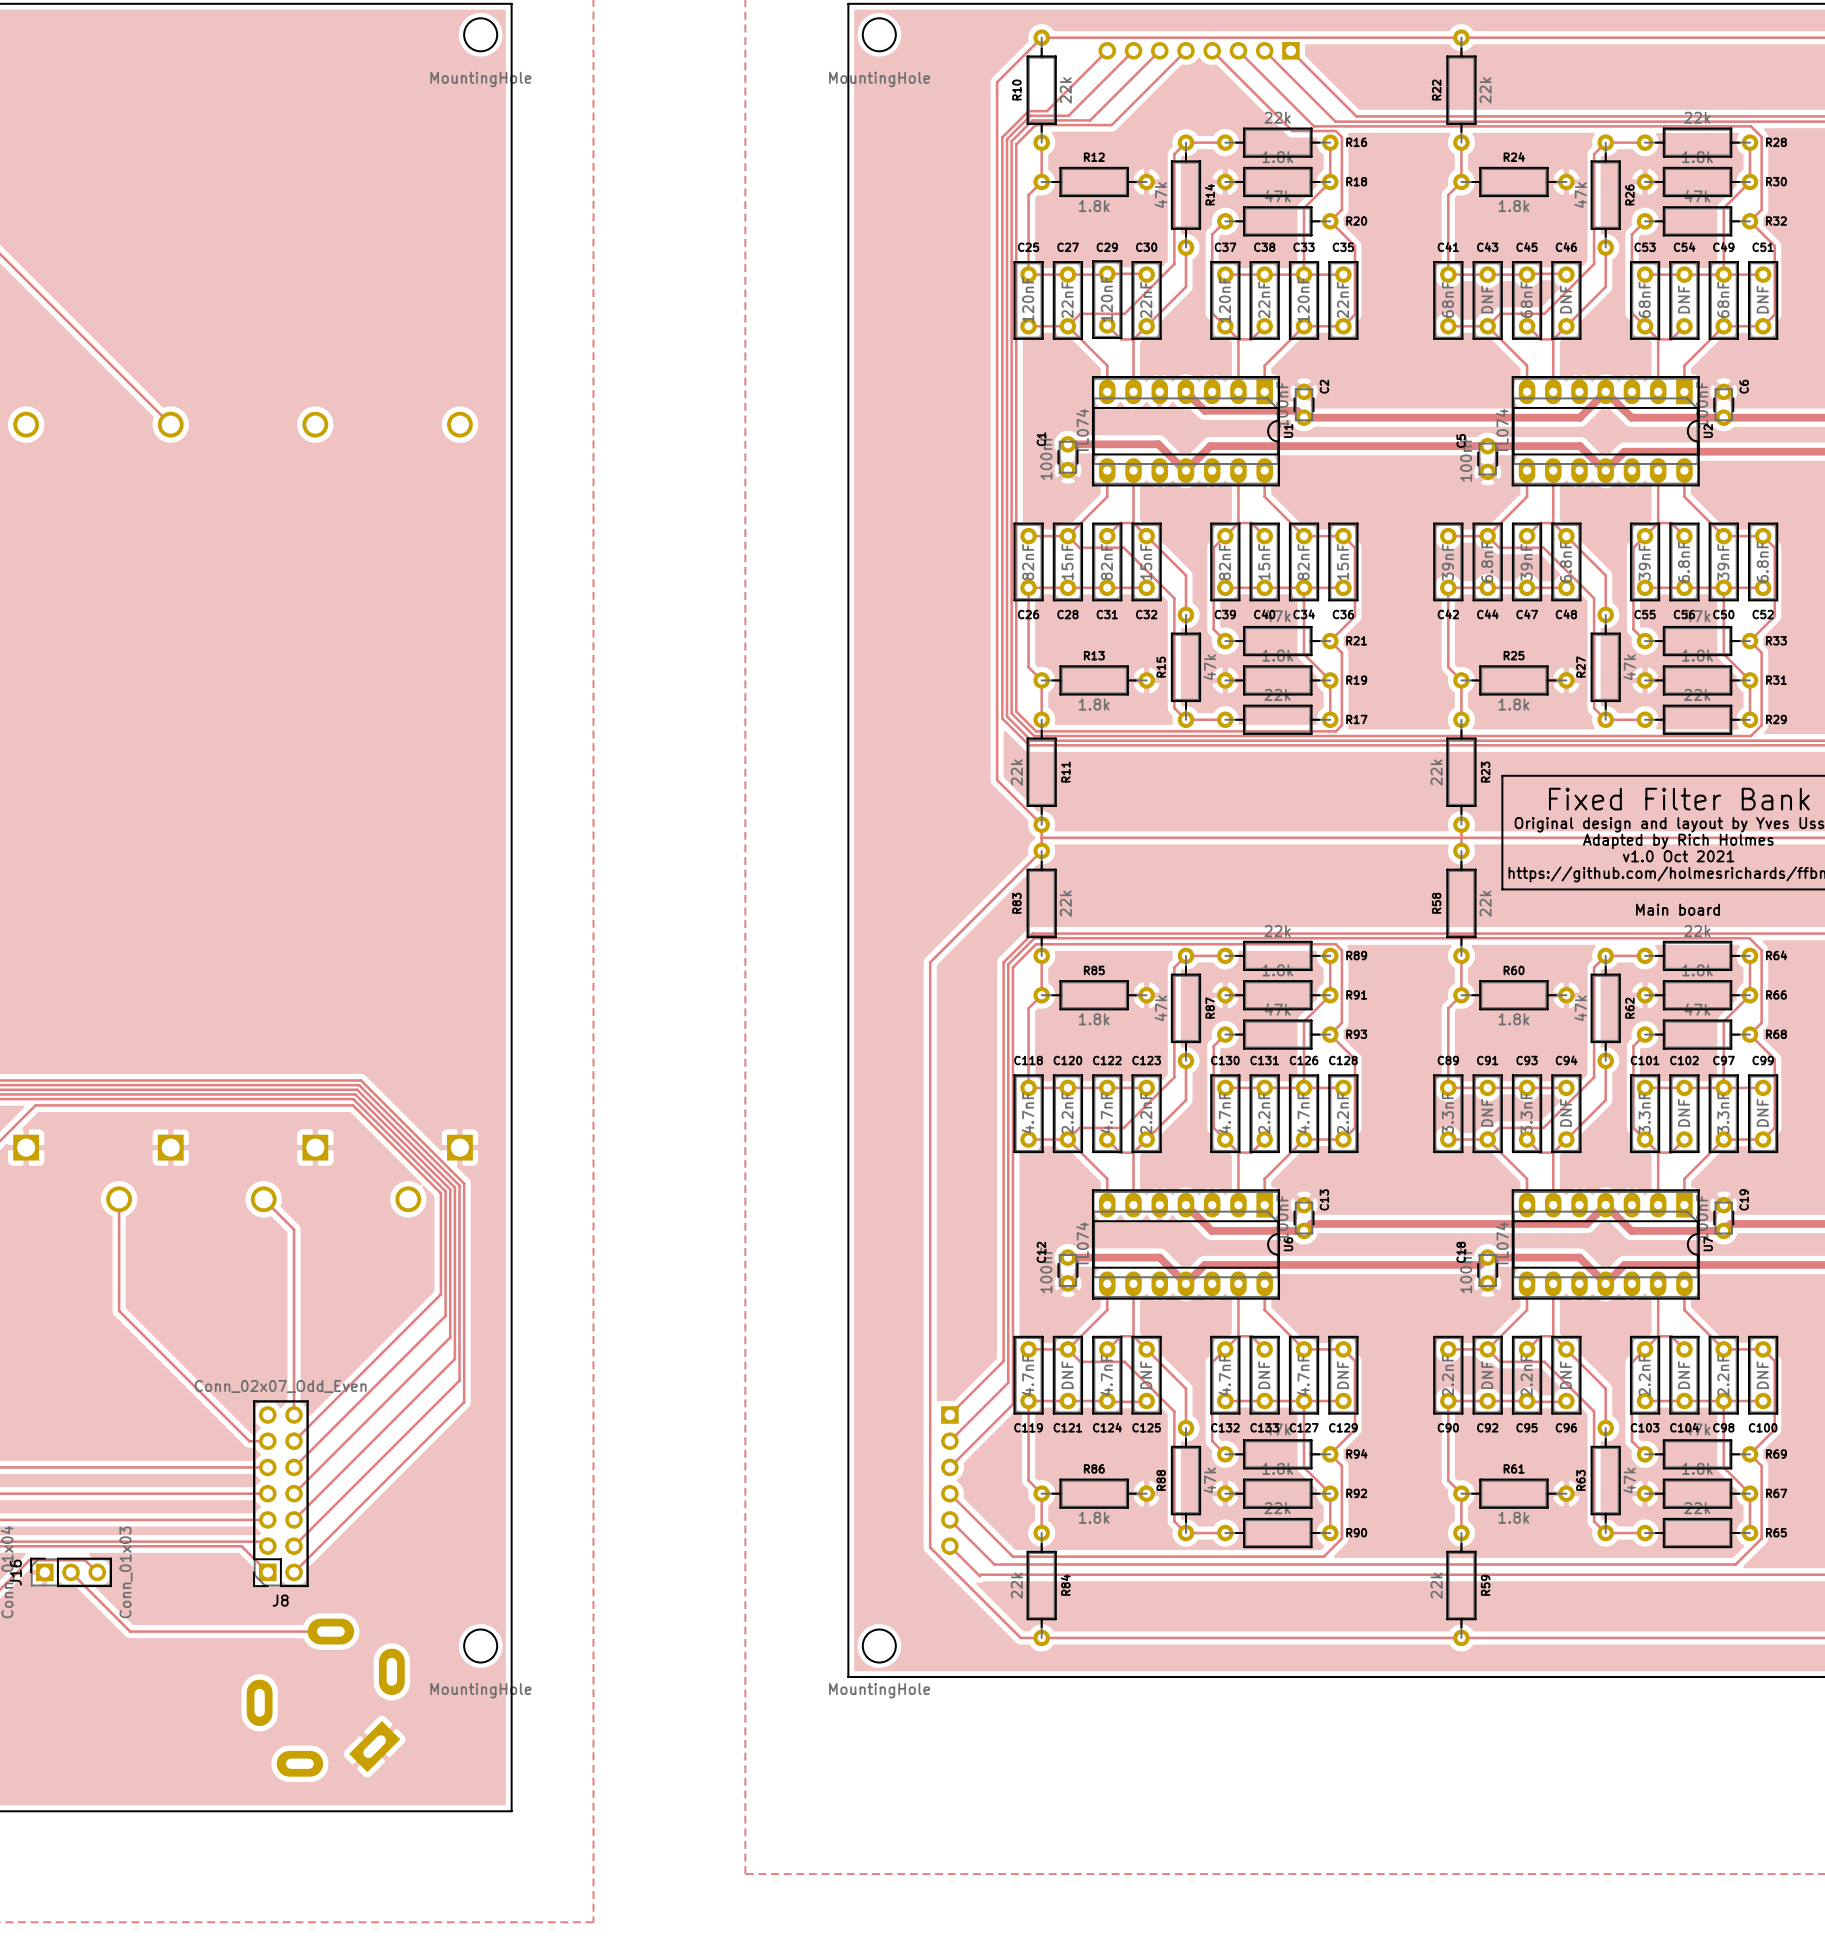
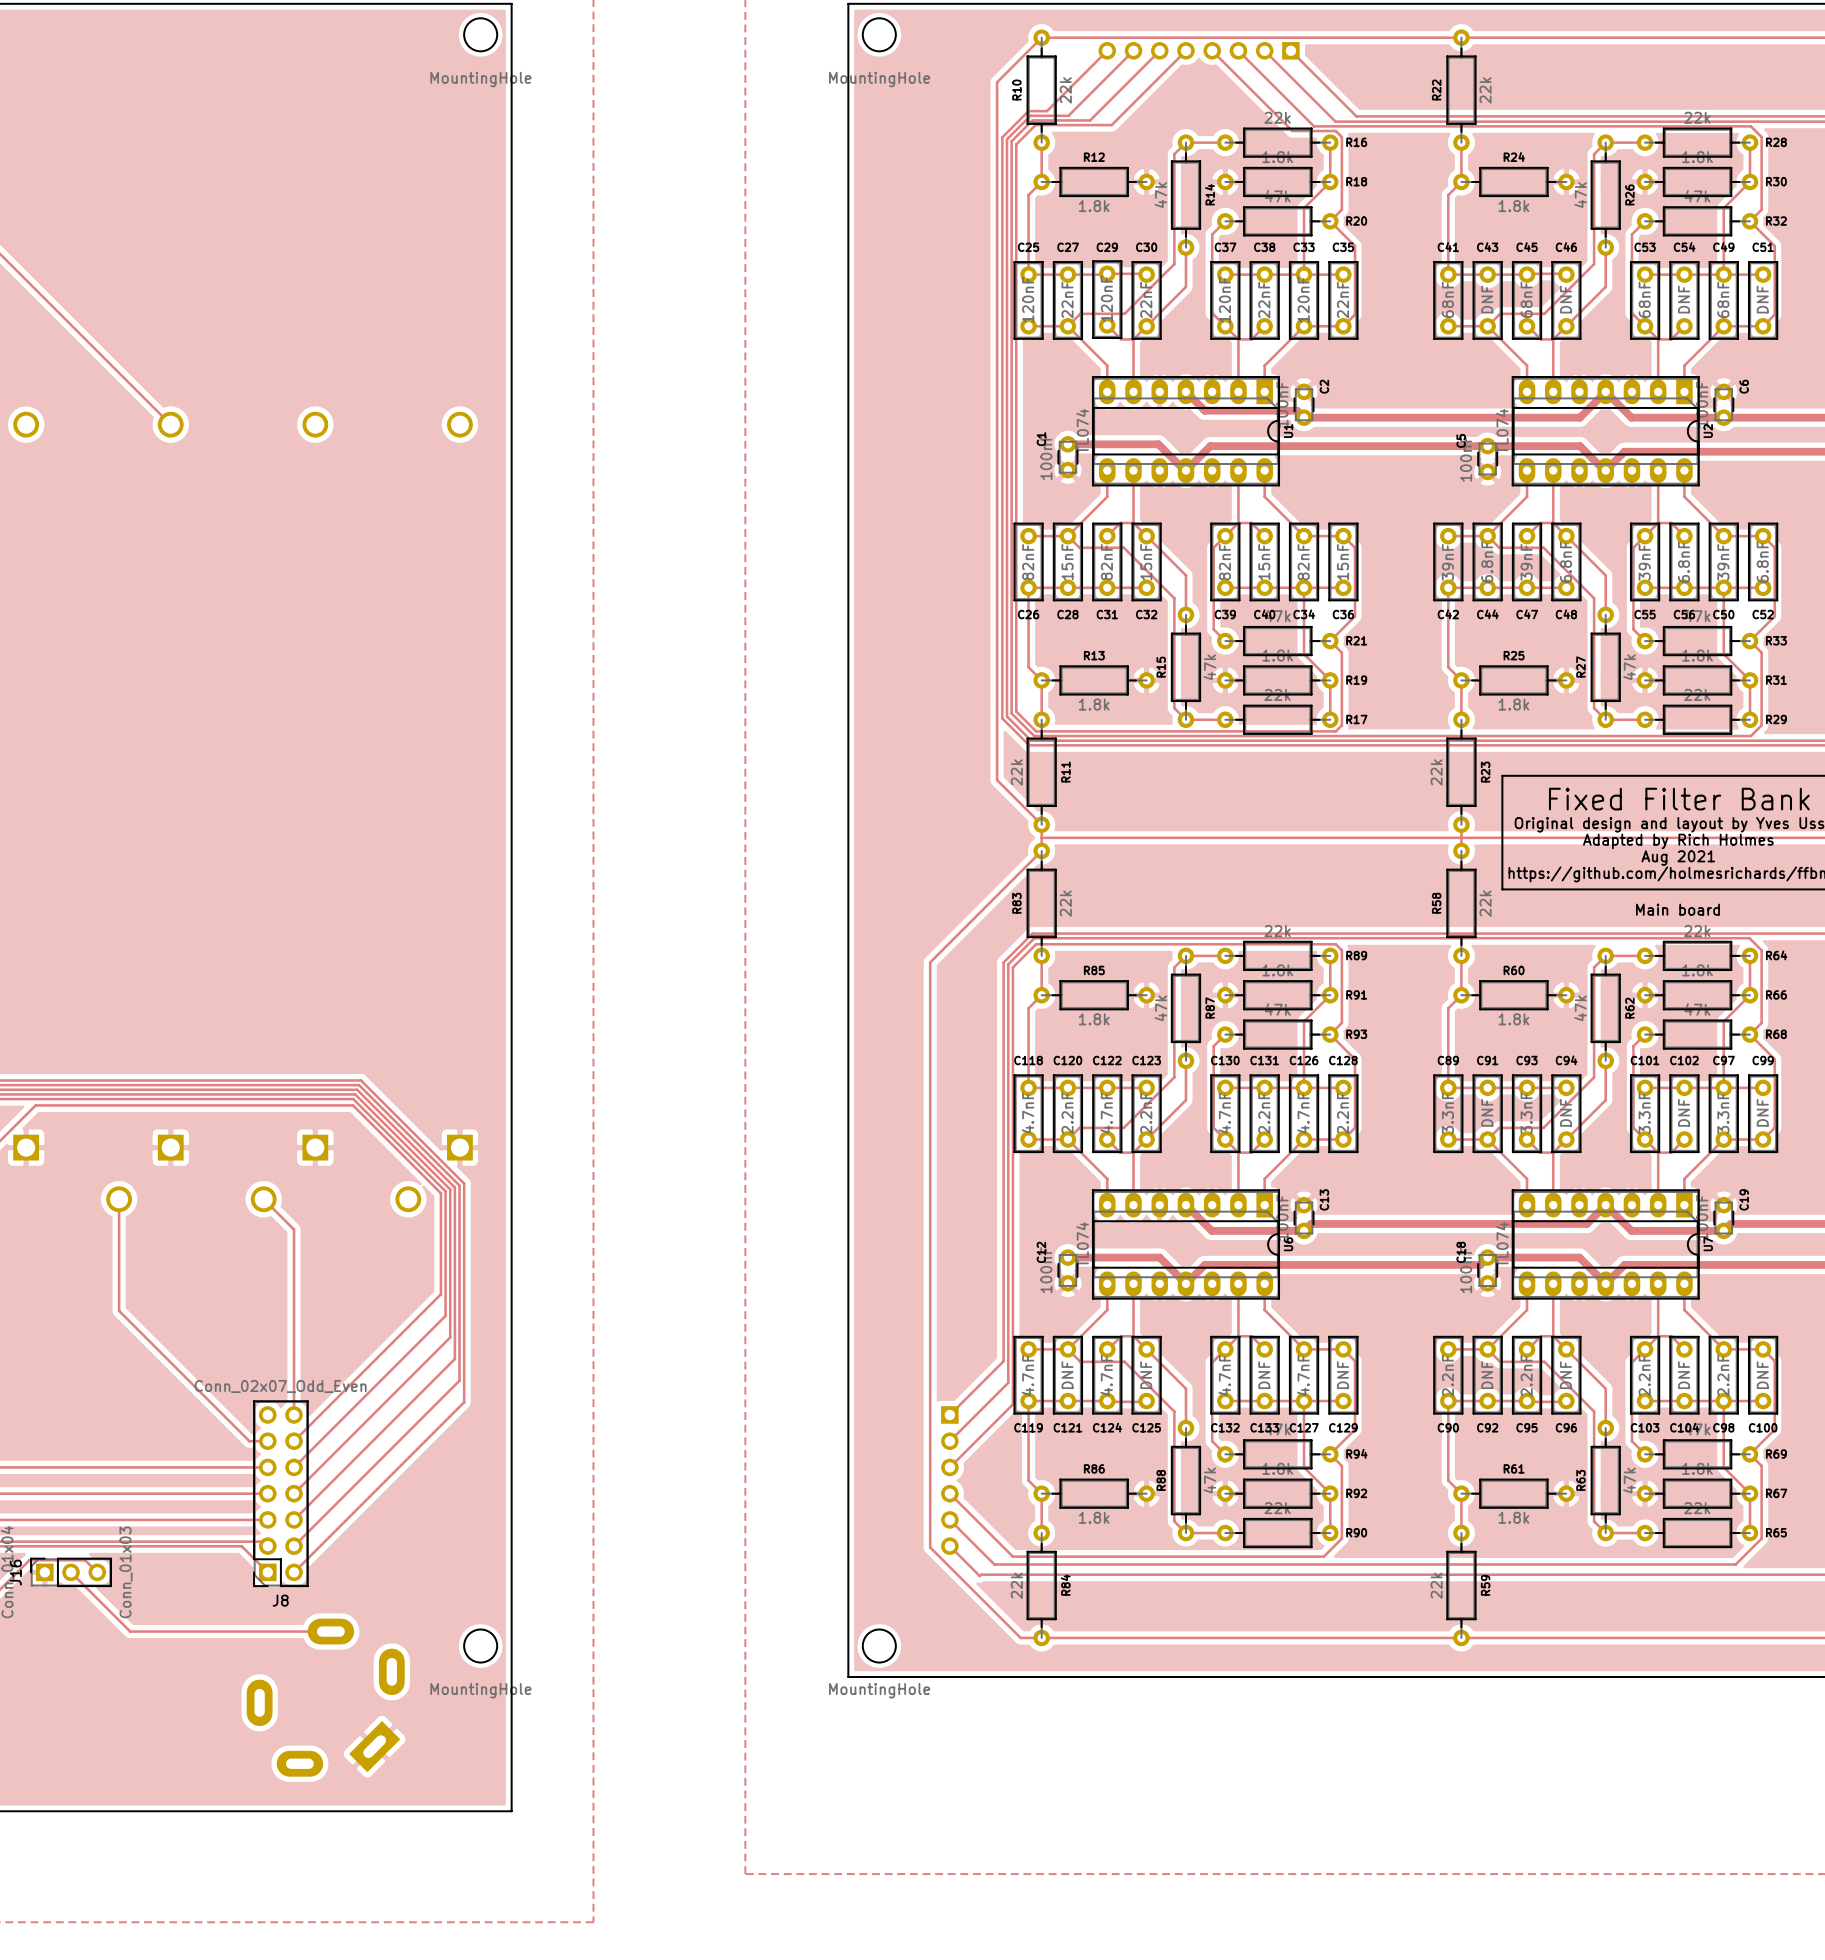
text: v1.0 Oct 2021 (1678, 856) -> Aug 2021 (1678, 858)

